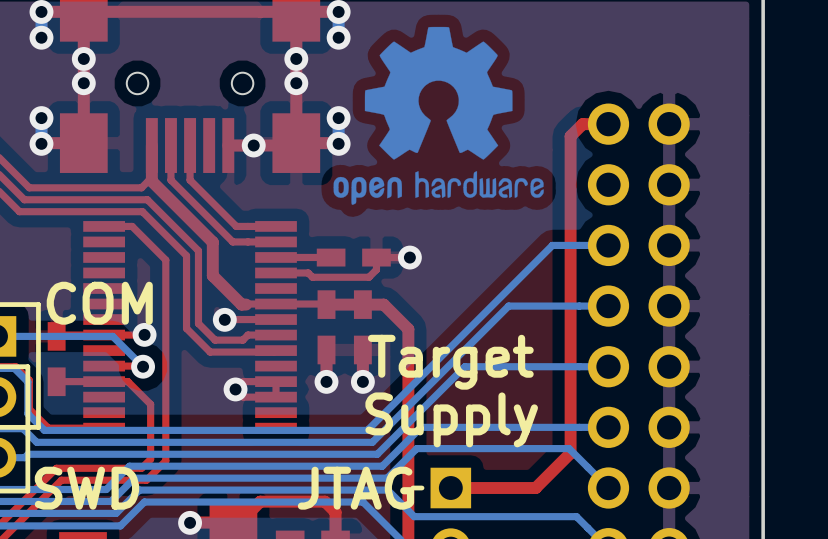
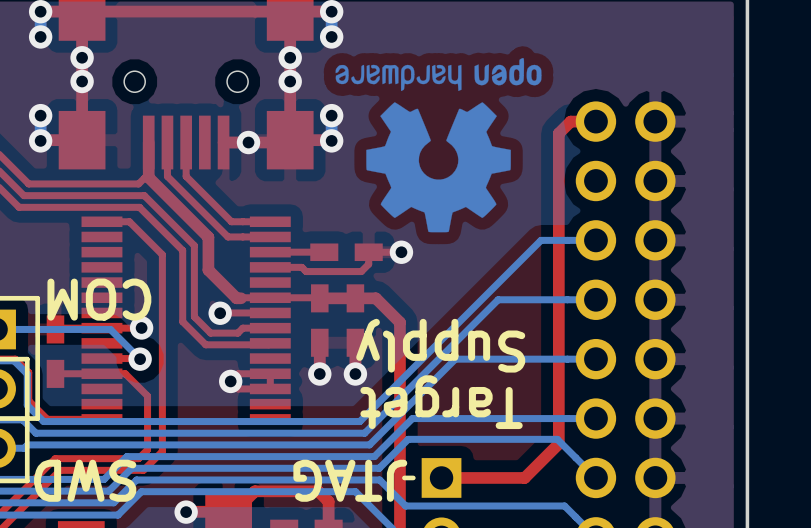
drawing: [333, 26, 544, 205] -> none
drawing: none -> [335, 58, 542, 233]
text rotation: 0° (99, 303) -> 180° (99, 299)
text: Target (450, 362) -> Supply (440, 345)
text: Supply (451, 419) -> Target (441, 402)
text rotation: 0° (86, 488) -> 180° (85, 480)
text rotation: 0° (355, 488) -> 180° (350, 480)

